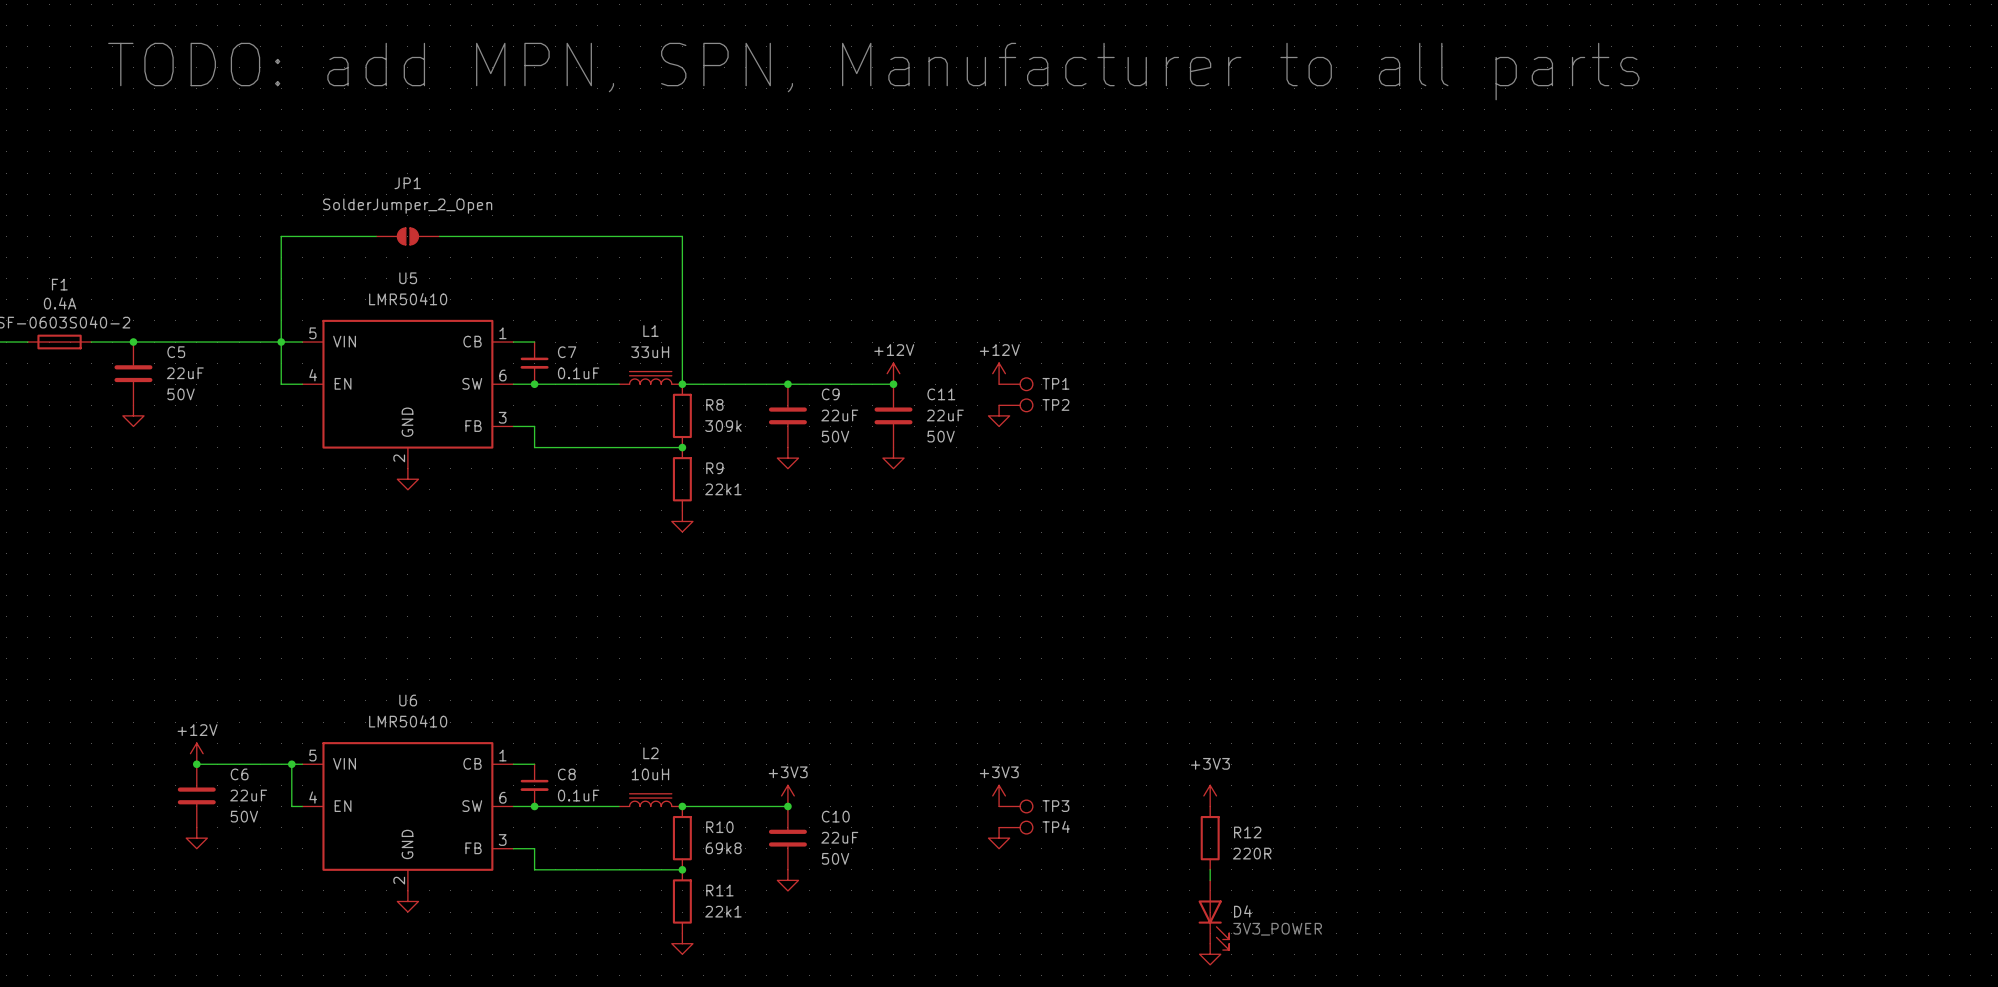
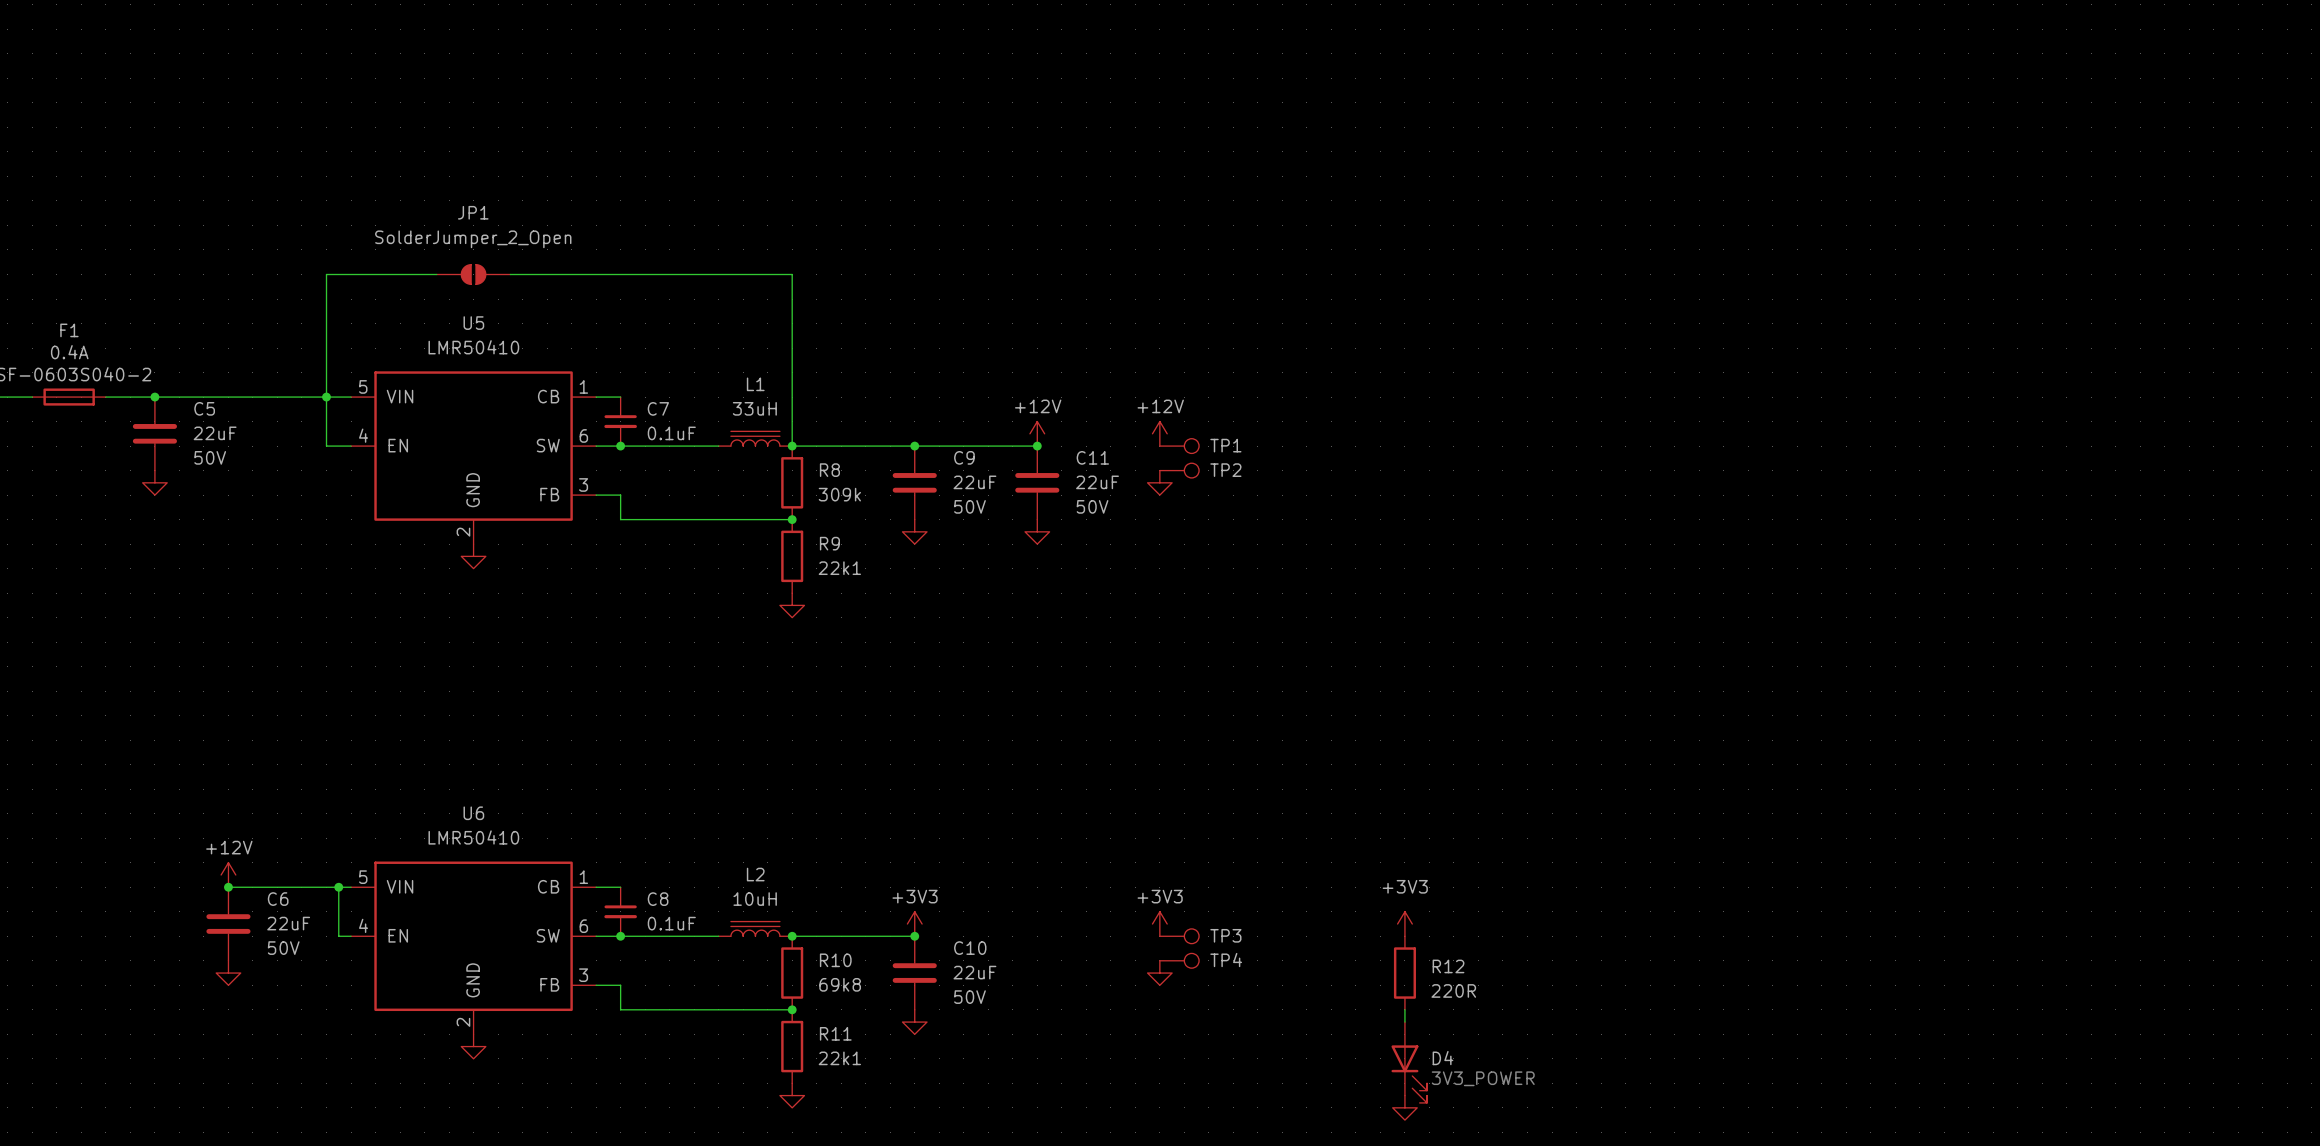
text: TODO: add MPN, SPN, Manufacturer to all parts (873, 71) -> none

